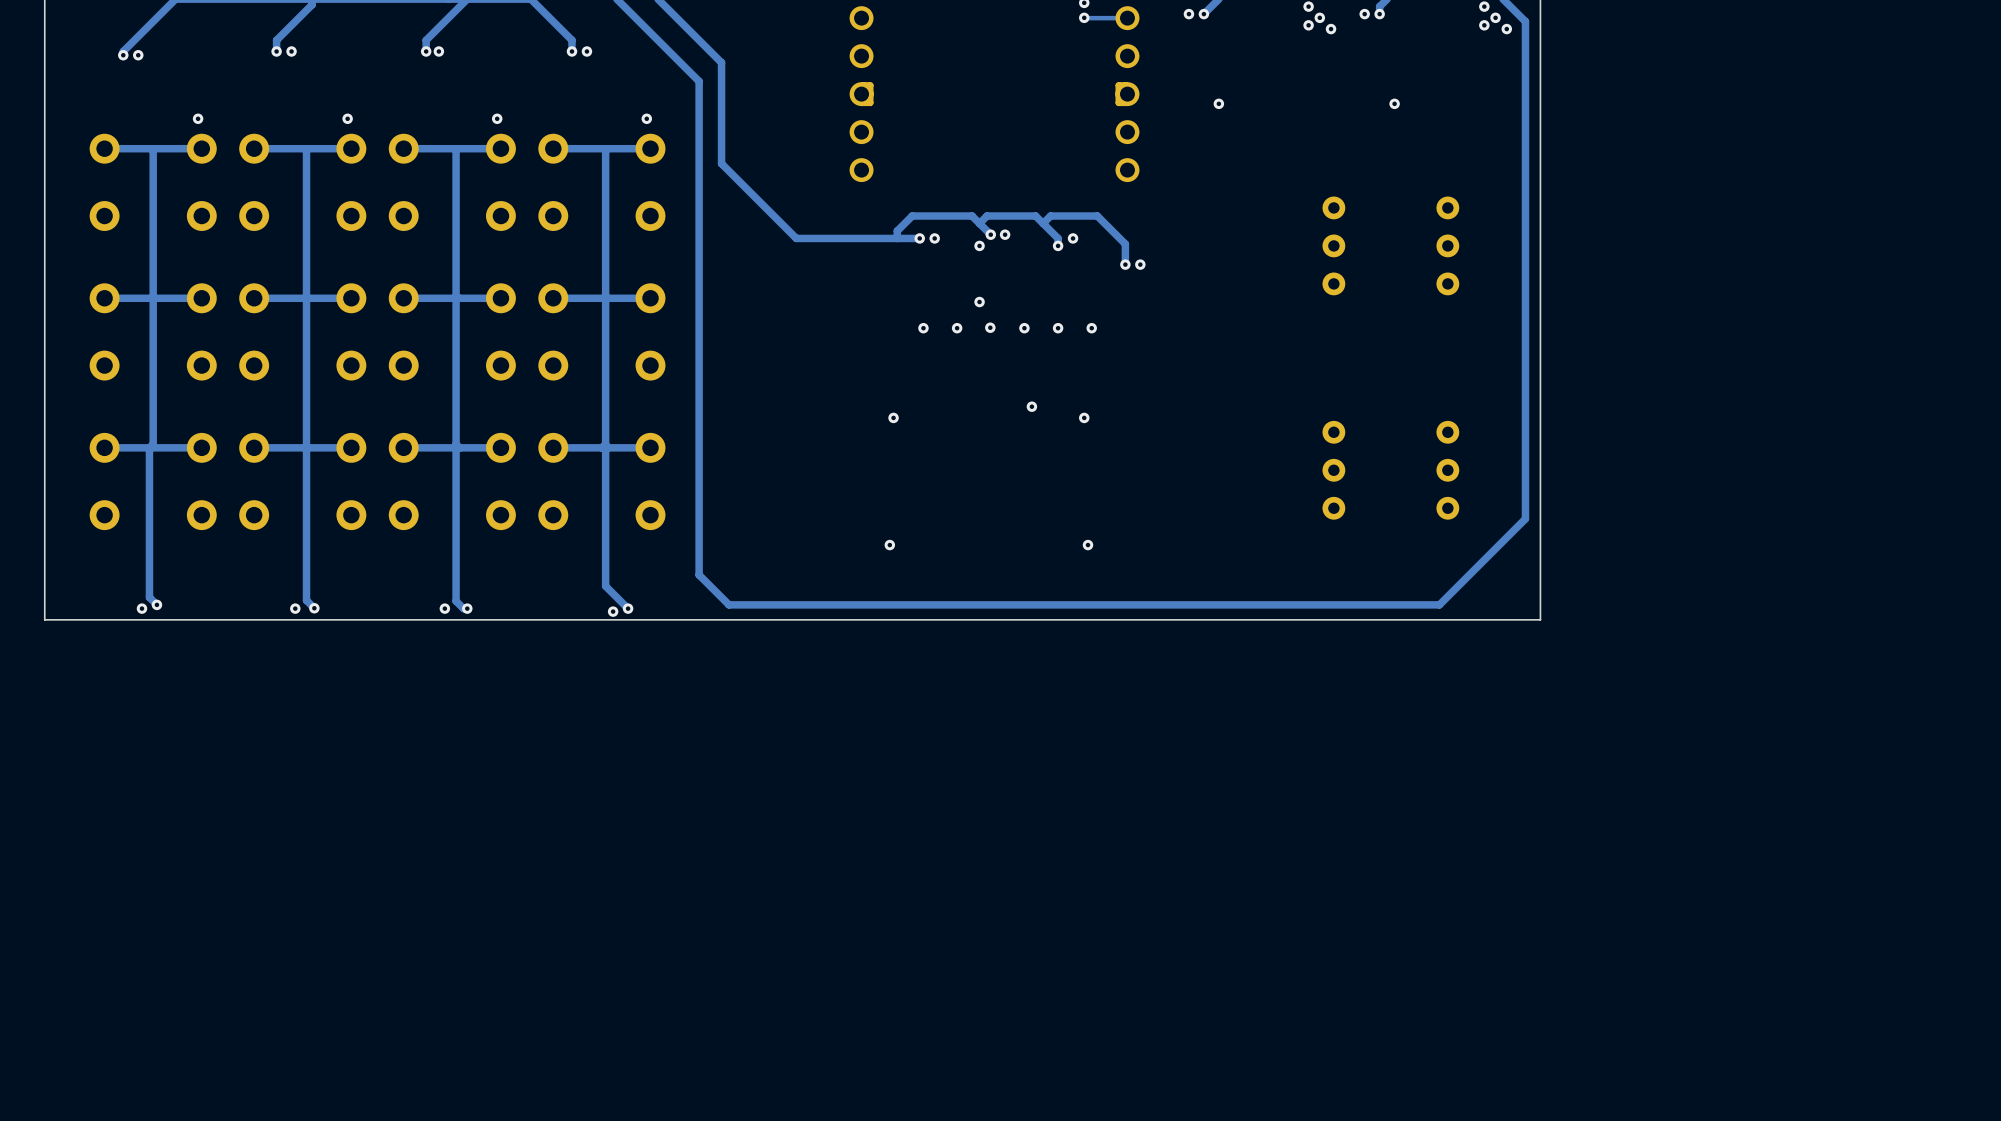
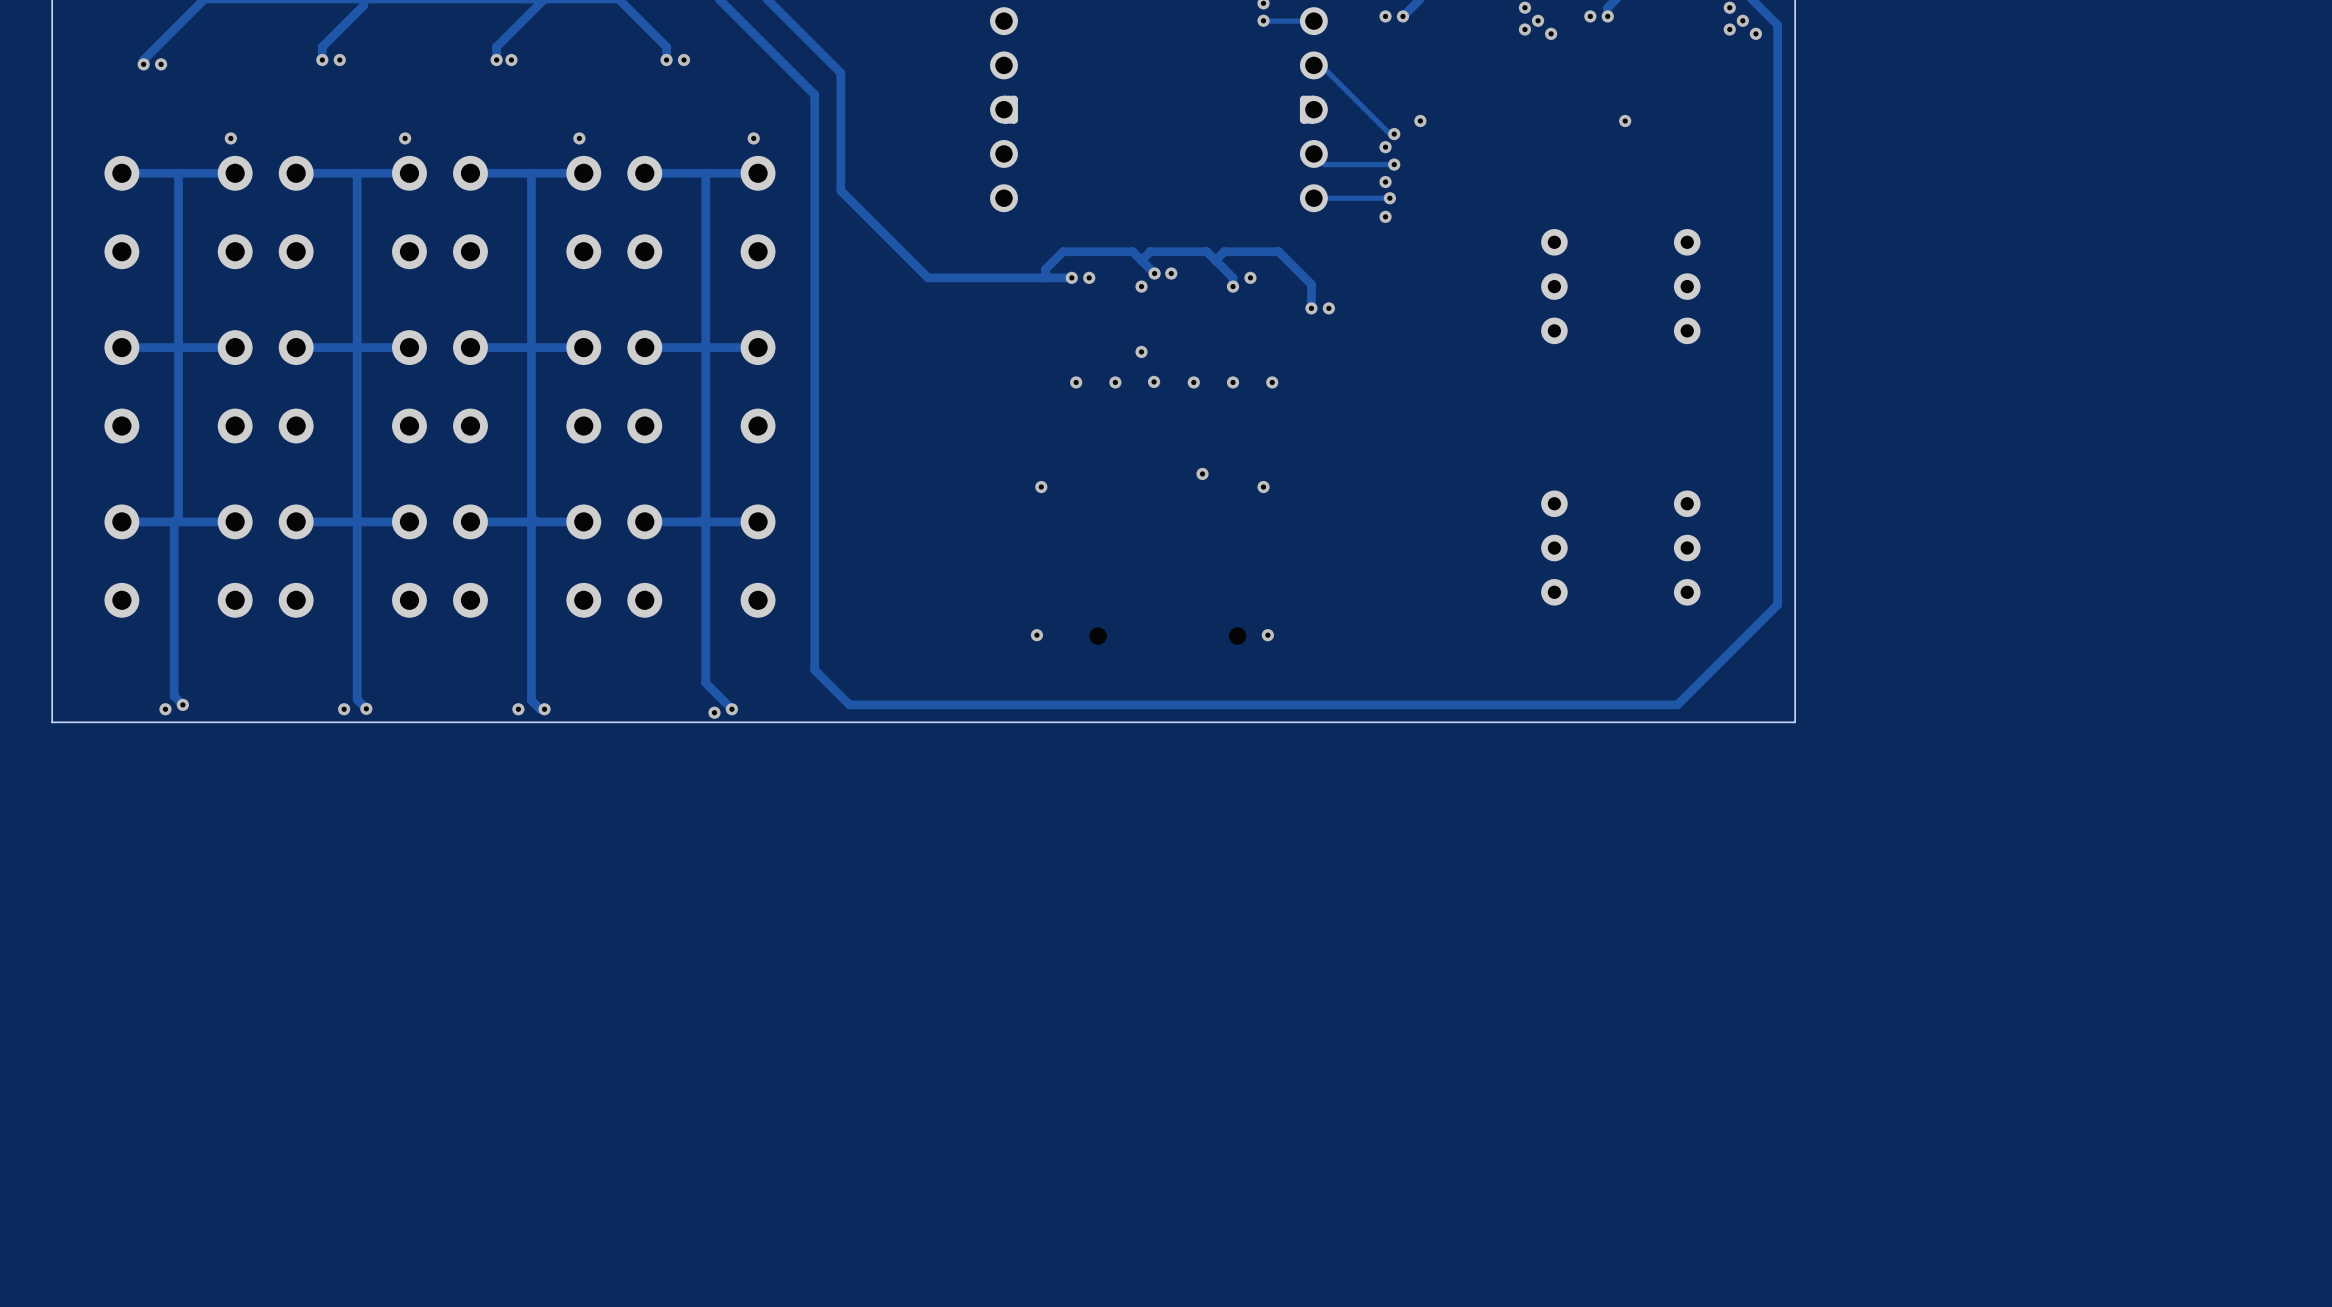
track: none -> (1313, 65) (1321, 65) (1389, 134) (1394, 134)
via: none -> (1394, 134)
via: none -> (1385, 147)
track: none -> (1313, 153) (1324, 164) (1394, 164)
via: none -> (1394, 164)
via: none -> (1385, 182)
track: none -> (1389, 198) (1313, 198)
via: none -> (1389, 198)
via: none -> (1385, 216)

